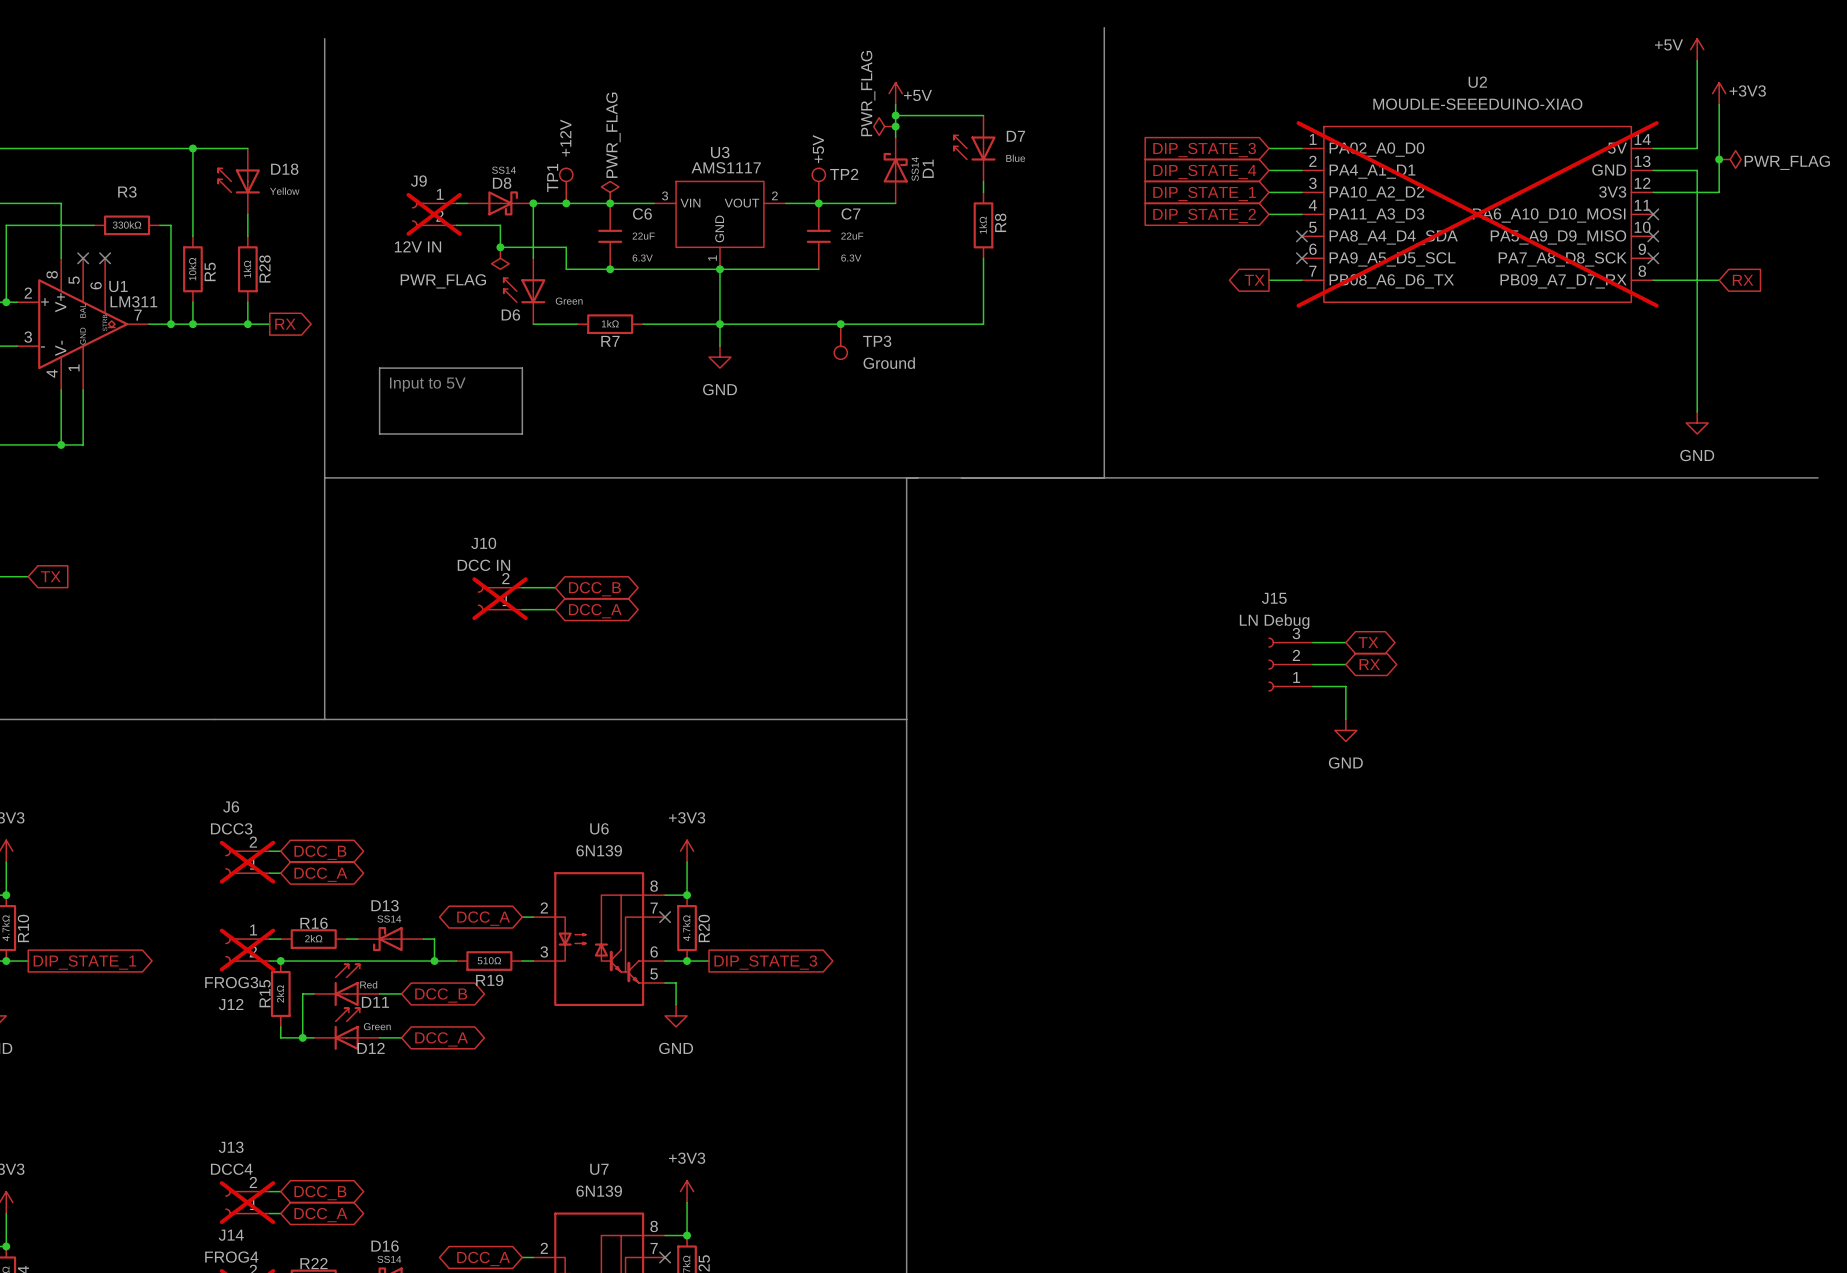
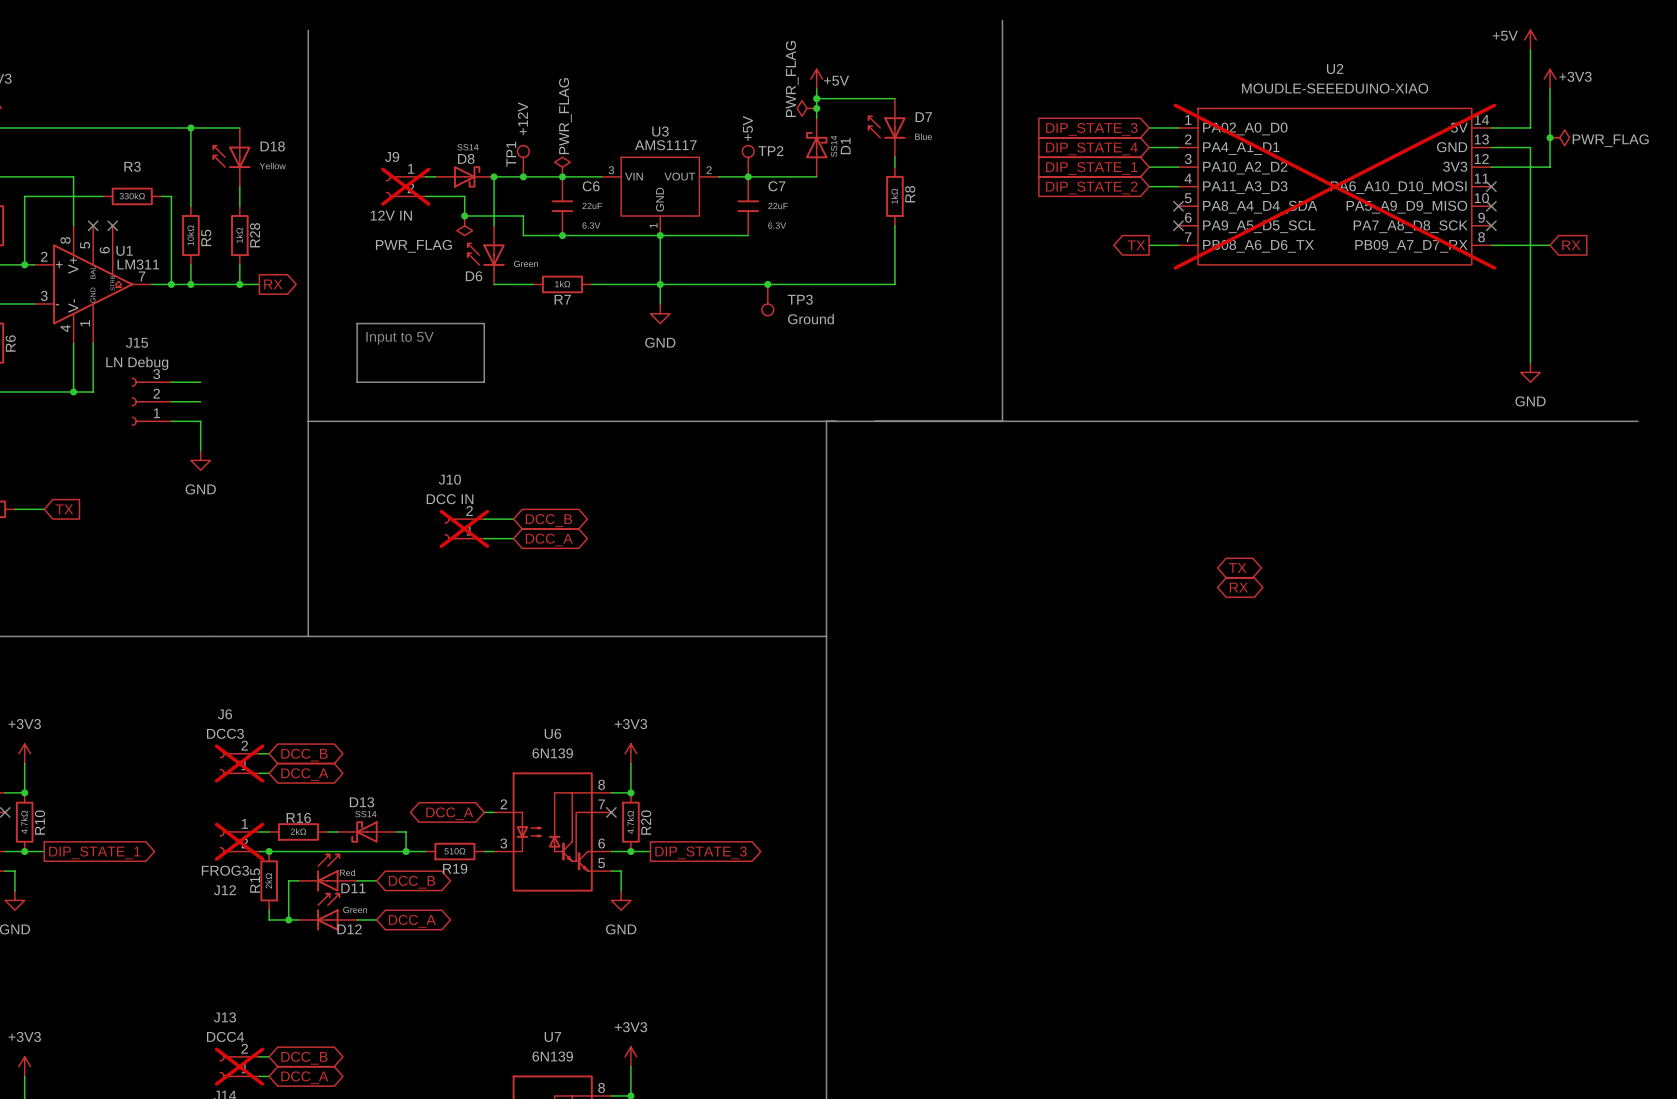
wire: none -> (171, 382) (200, 382)
wire: none -> (171, 401) (200, 401)
wire: none -> (171, 421) (200, 421) (200, 450)
power symbol: none -> GND (200, 460)
wire: (1312, 642) (1345, 642) -> none
J15 position: (1290, 664) -> (151, 401)
wire: (1312, 664) (1345, 664) -> none
wire: (1312, 686) (1345, 686) (1345, 719) -> none
power symbol: GND (1345, 730) -> none

